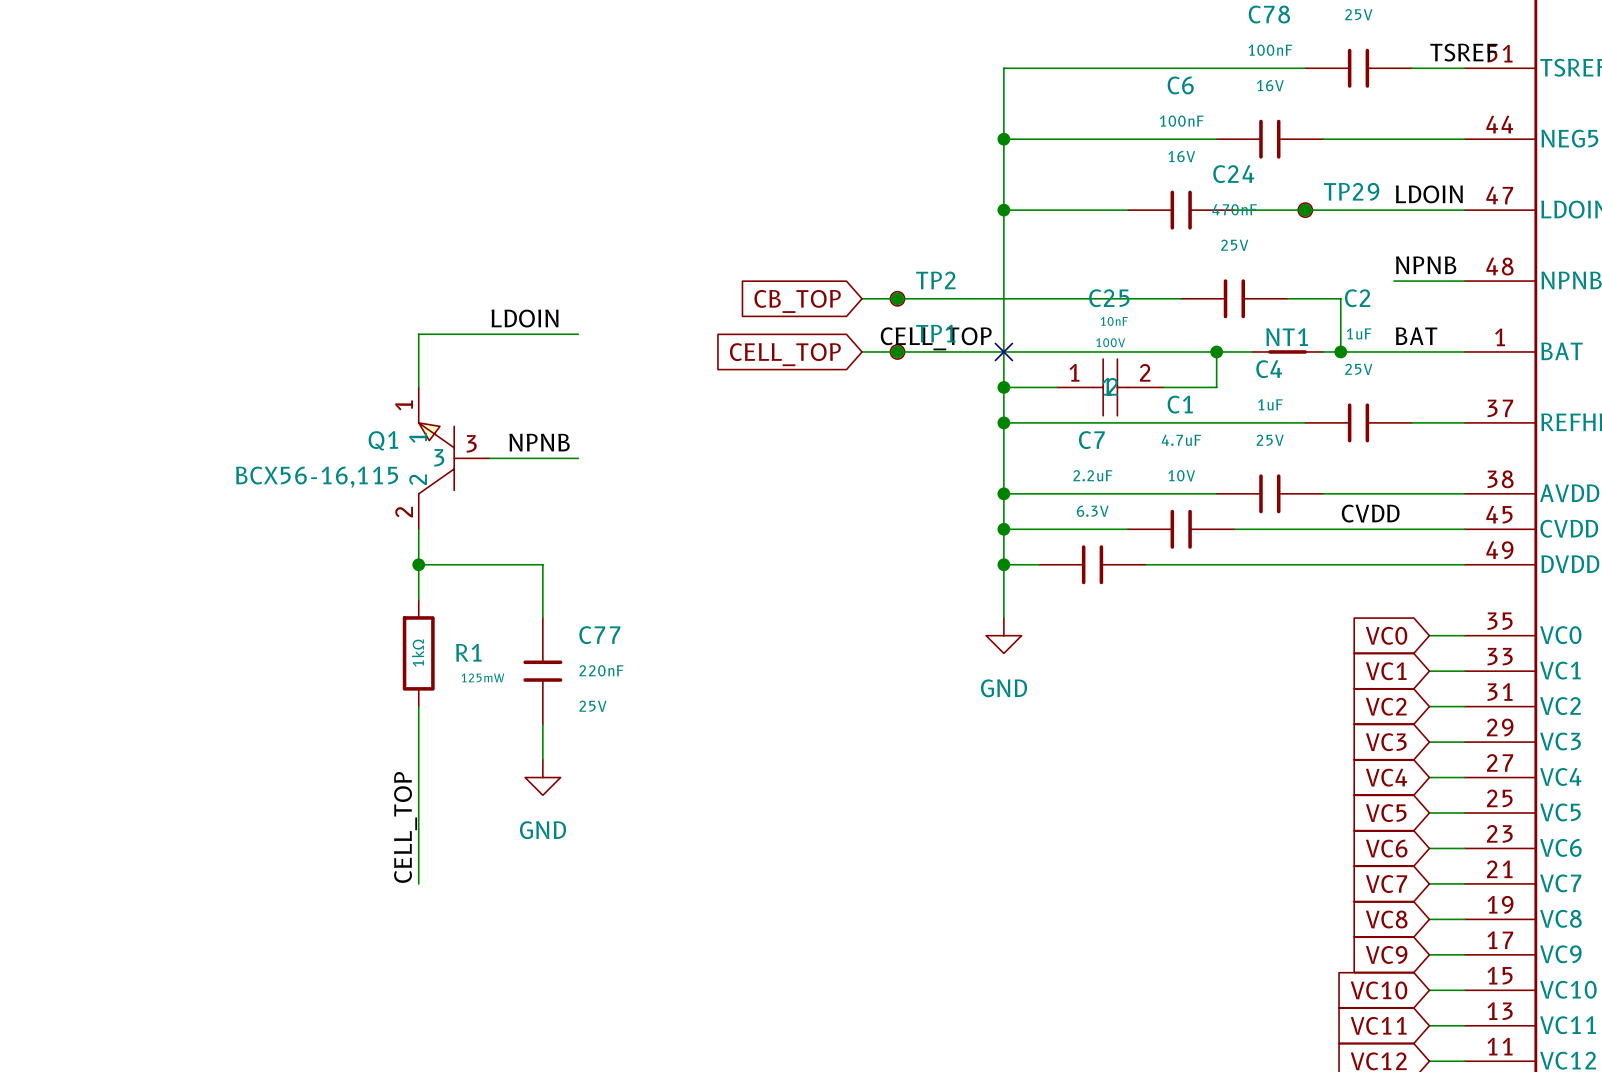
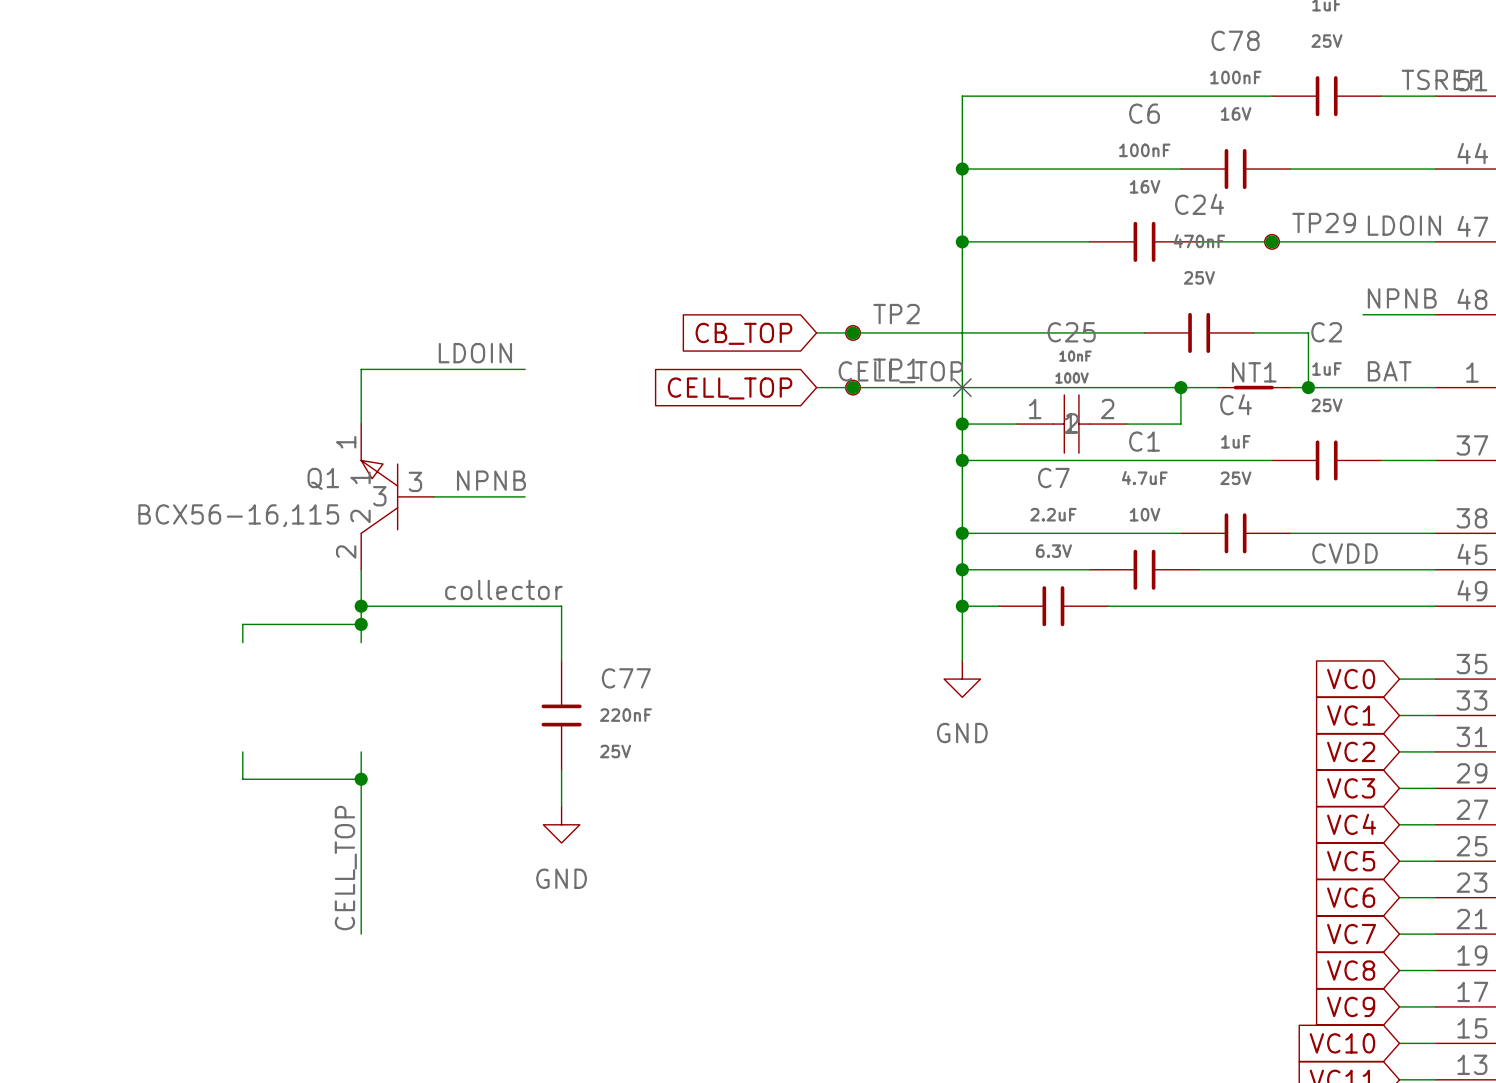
label: none -> collector (503, 589)
wire: (542, 564) (542, 617) -> (488, 606) (561, 606) (561, 660)
wire: none -> (361, 624) (242, 624) (242, 642)
junction: none -> (361, 624)
R1: 1kΩ (418, 653) -> none
C77 position: (542, 671) -> (561, 715)
wire: none -> (242, 751) (242, 779) (361, 779)
wire: (542, 724) (542, 759) -> (561, 770) (561, 806)
junction: none -> (361, 779)
power symbol position: GND (542, 777) -> GND (561, 824)

